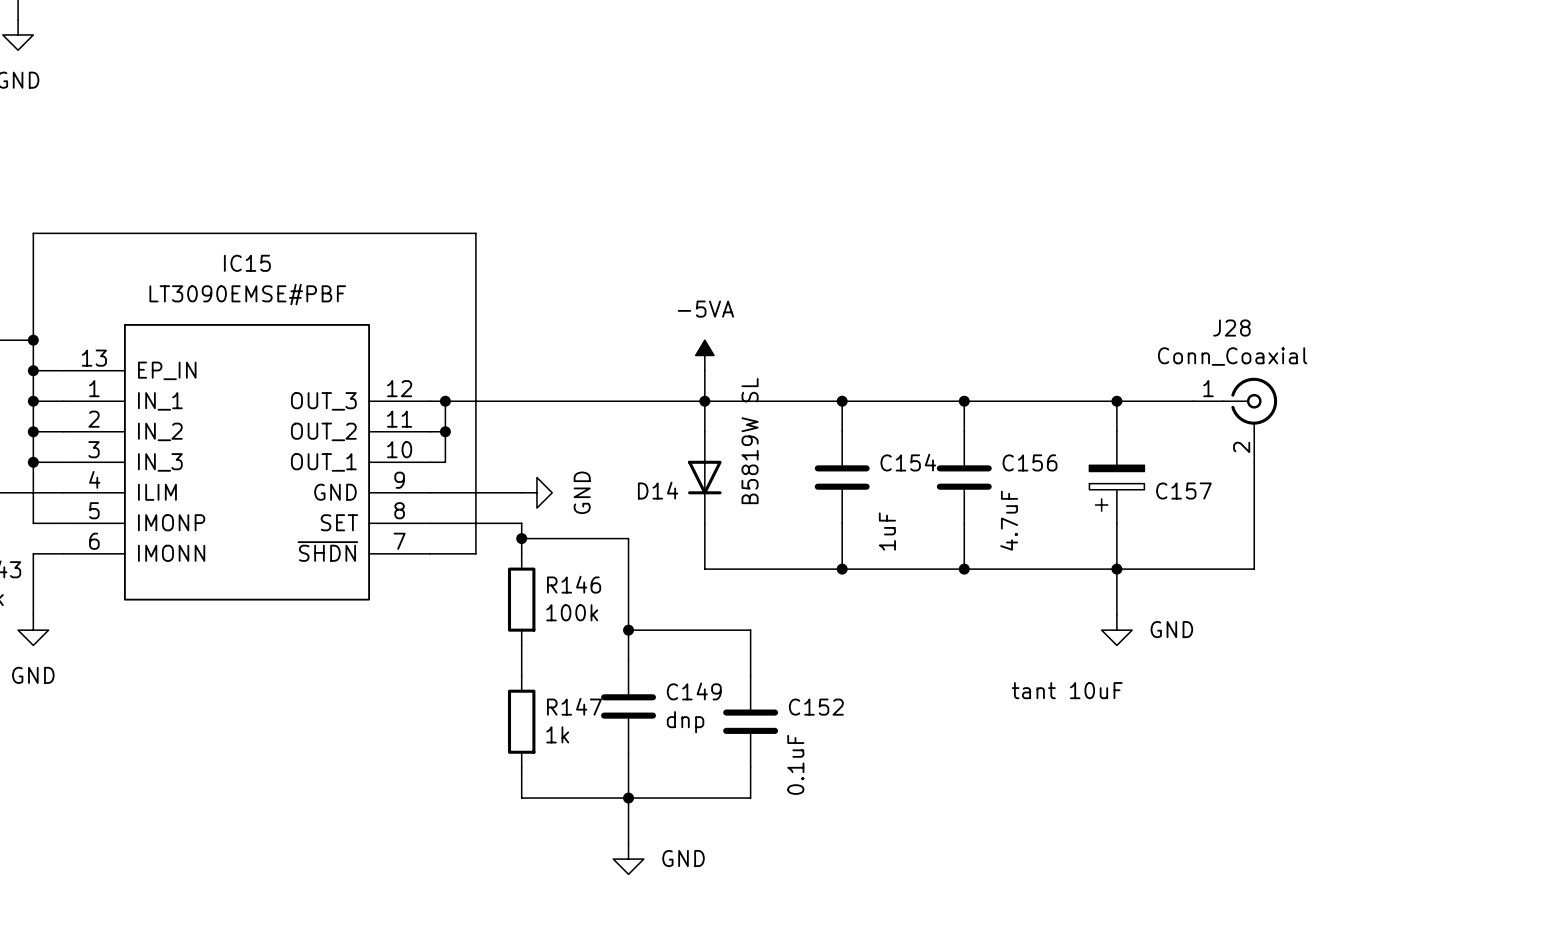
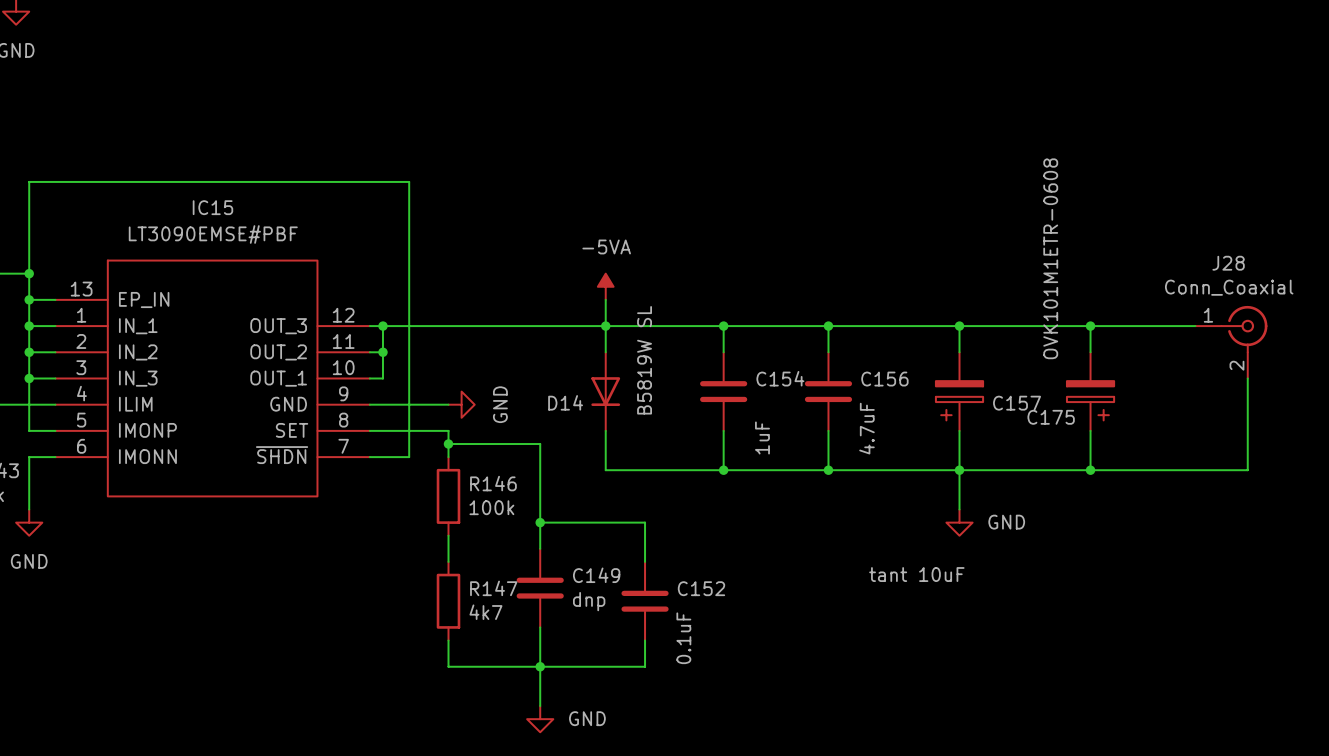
wire: none -> (1025, 326) (1195, 326)
wire: none -> (1090, 326) (1090, 352)
junction: none -> (1090, 326)
J28 position: (1235, 420) -> (1231, 342)
wire: (1254, 462) (1254, 569) -> (1247, 378) (1247, 470) (1077, 470)
C175: none -> OVK101M1ETR-0608 (1090, 391)
wire: none -> (1090, 430) (1090, 470)
junction: none -> (1090, 470)
R147 value: 1k (557, 734) -> 4k7 (485, 612)

